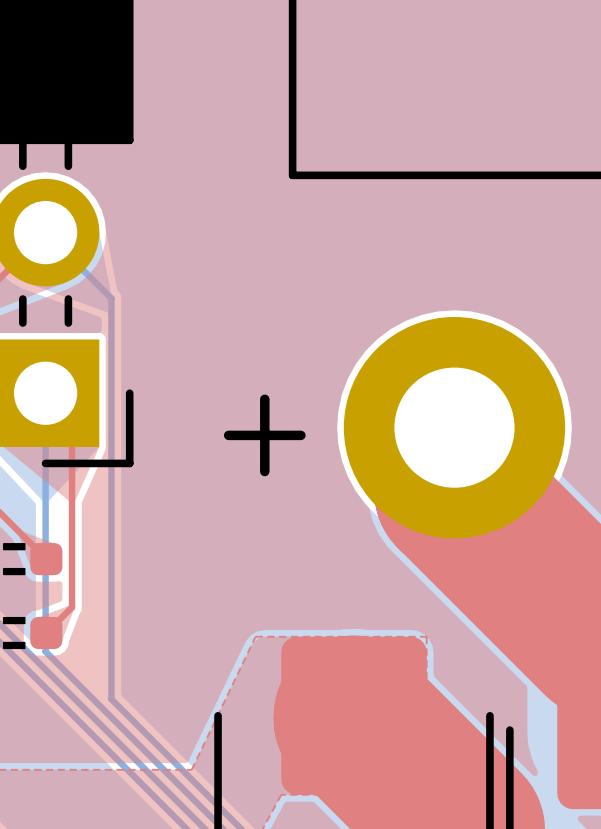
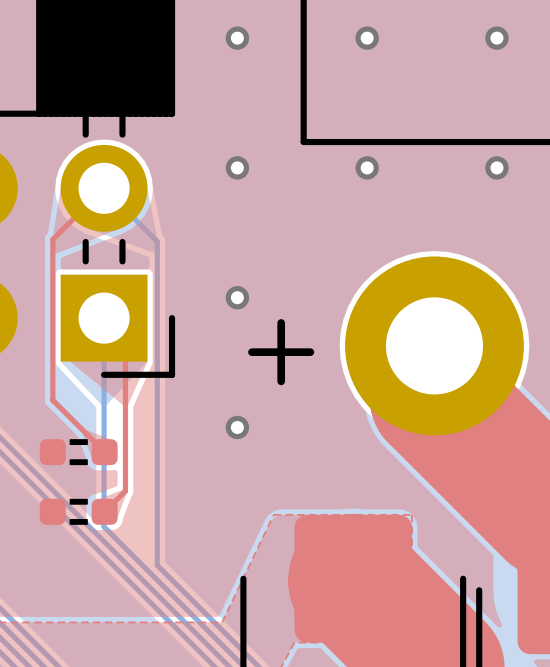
via: none -> (237, 38)
via: none -> (367, 38)
via: none -> (496, 38)
via: none -> (237, 167)
via: none -> (367, 167)
via: none -> (496, 167)
via: none -> (237, 297)
via: none -> (237, 427)

